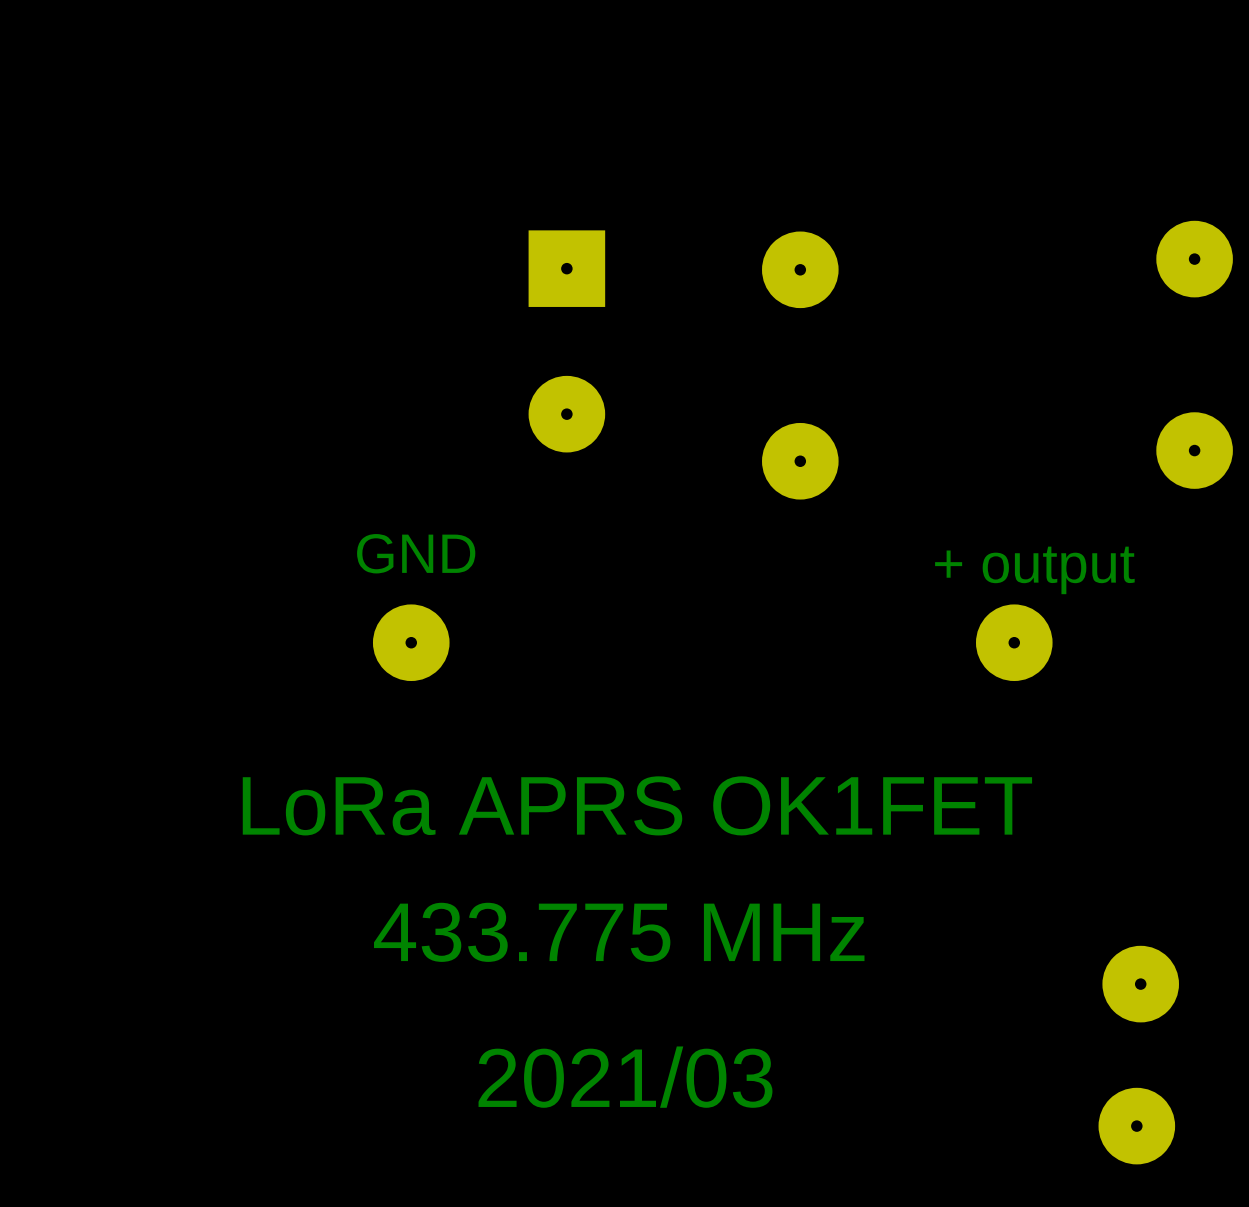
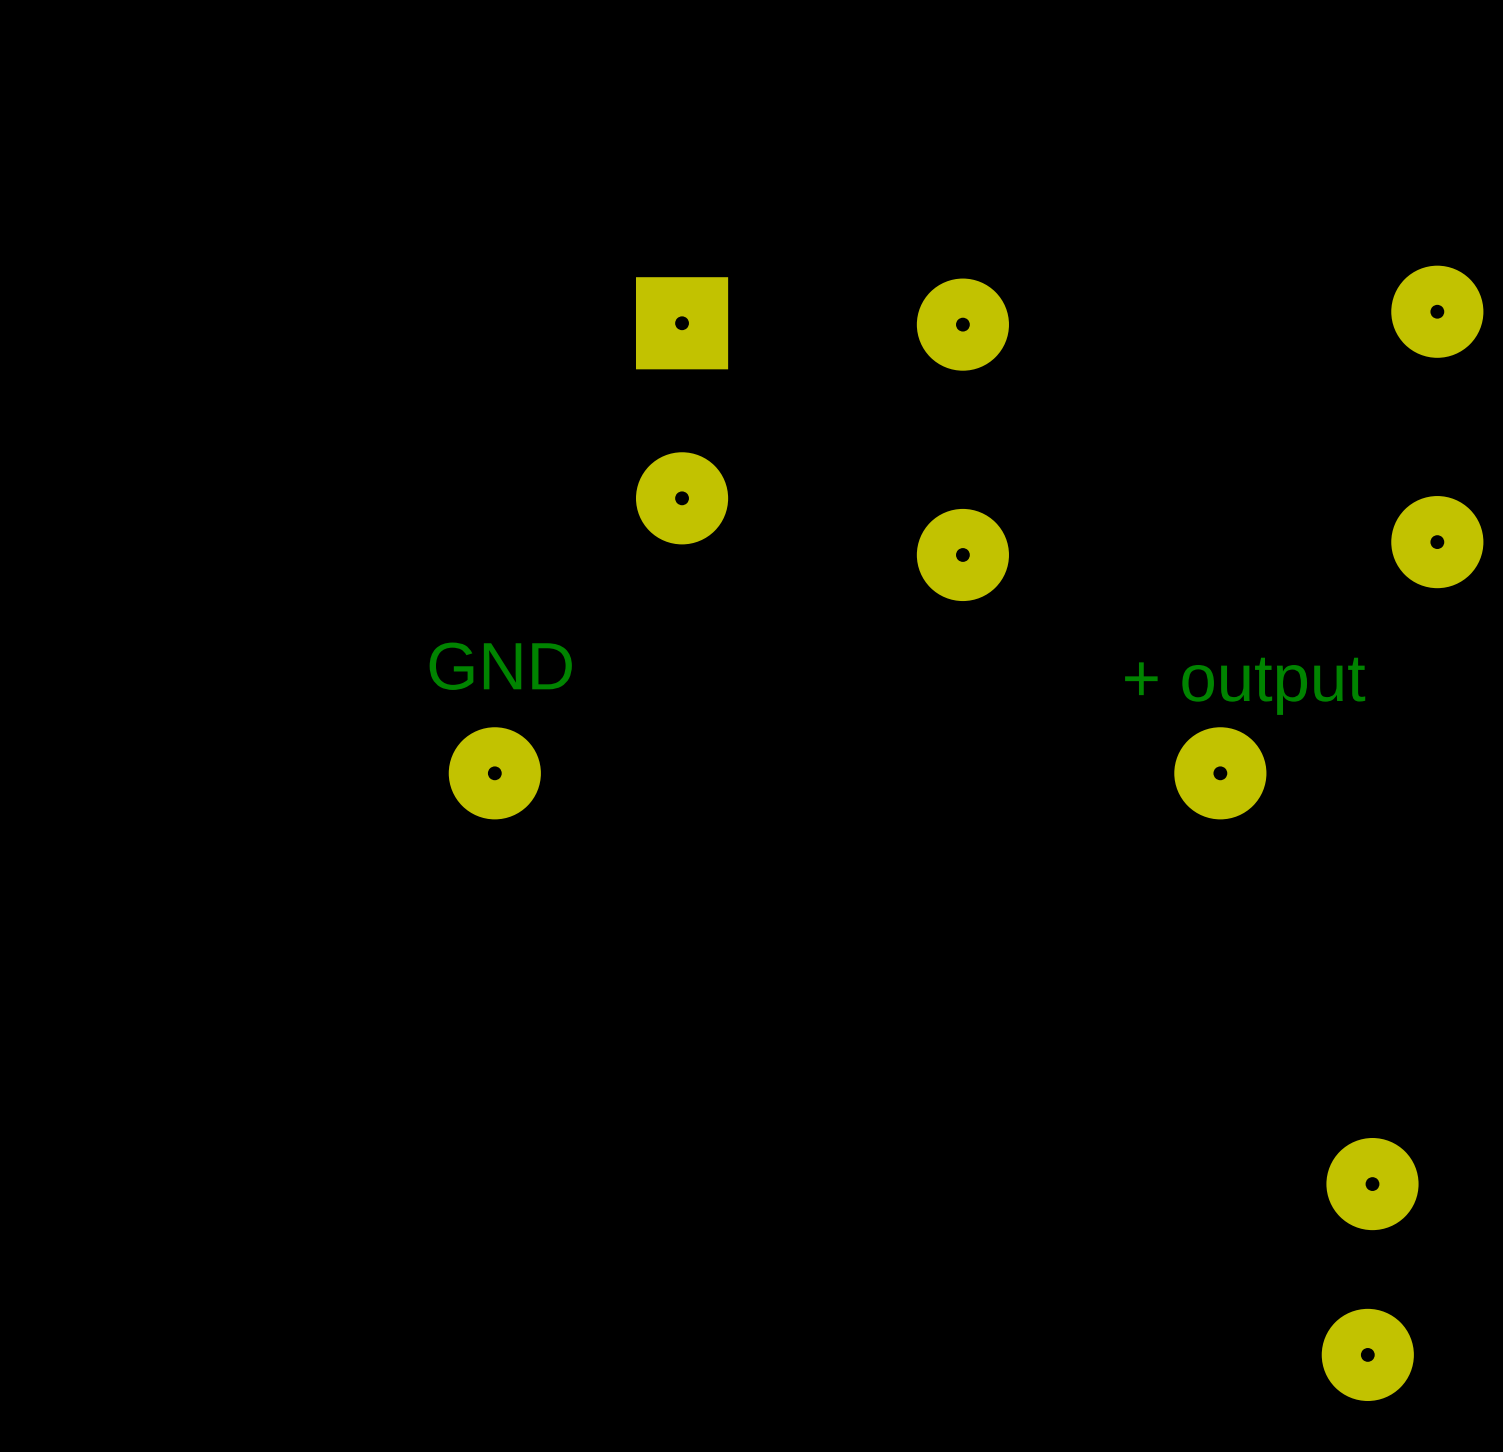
text: LoRa APRS OK1FET (637, 805) -> none
text: 433.775 MHz (619, 932) -> none
text: 2021/03 (625, 1077) -> none

